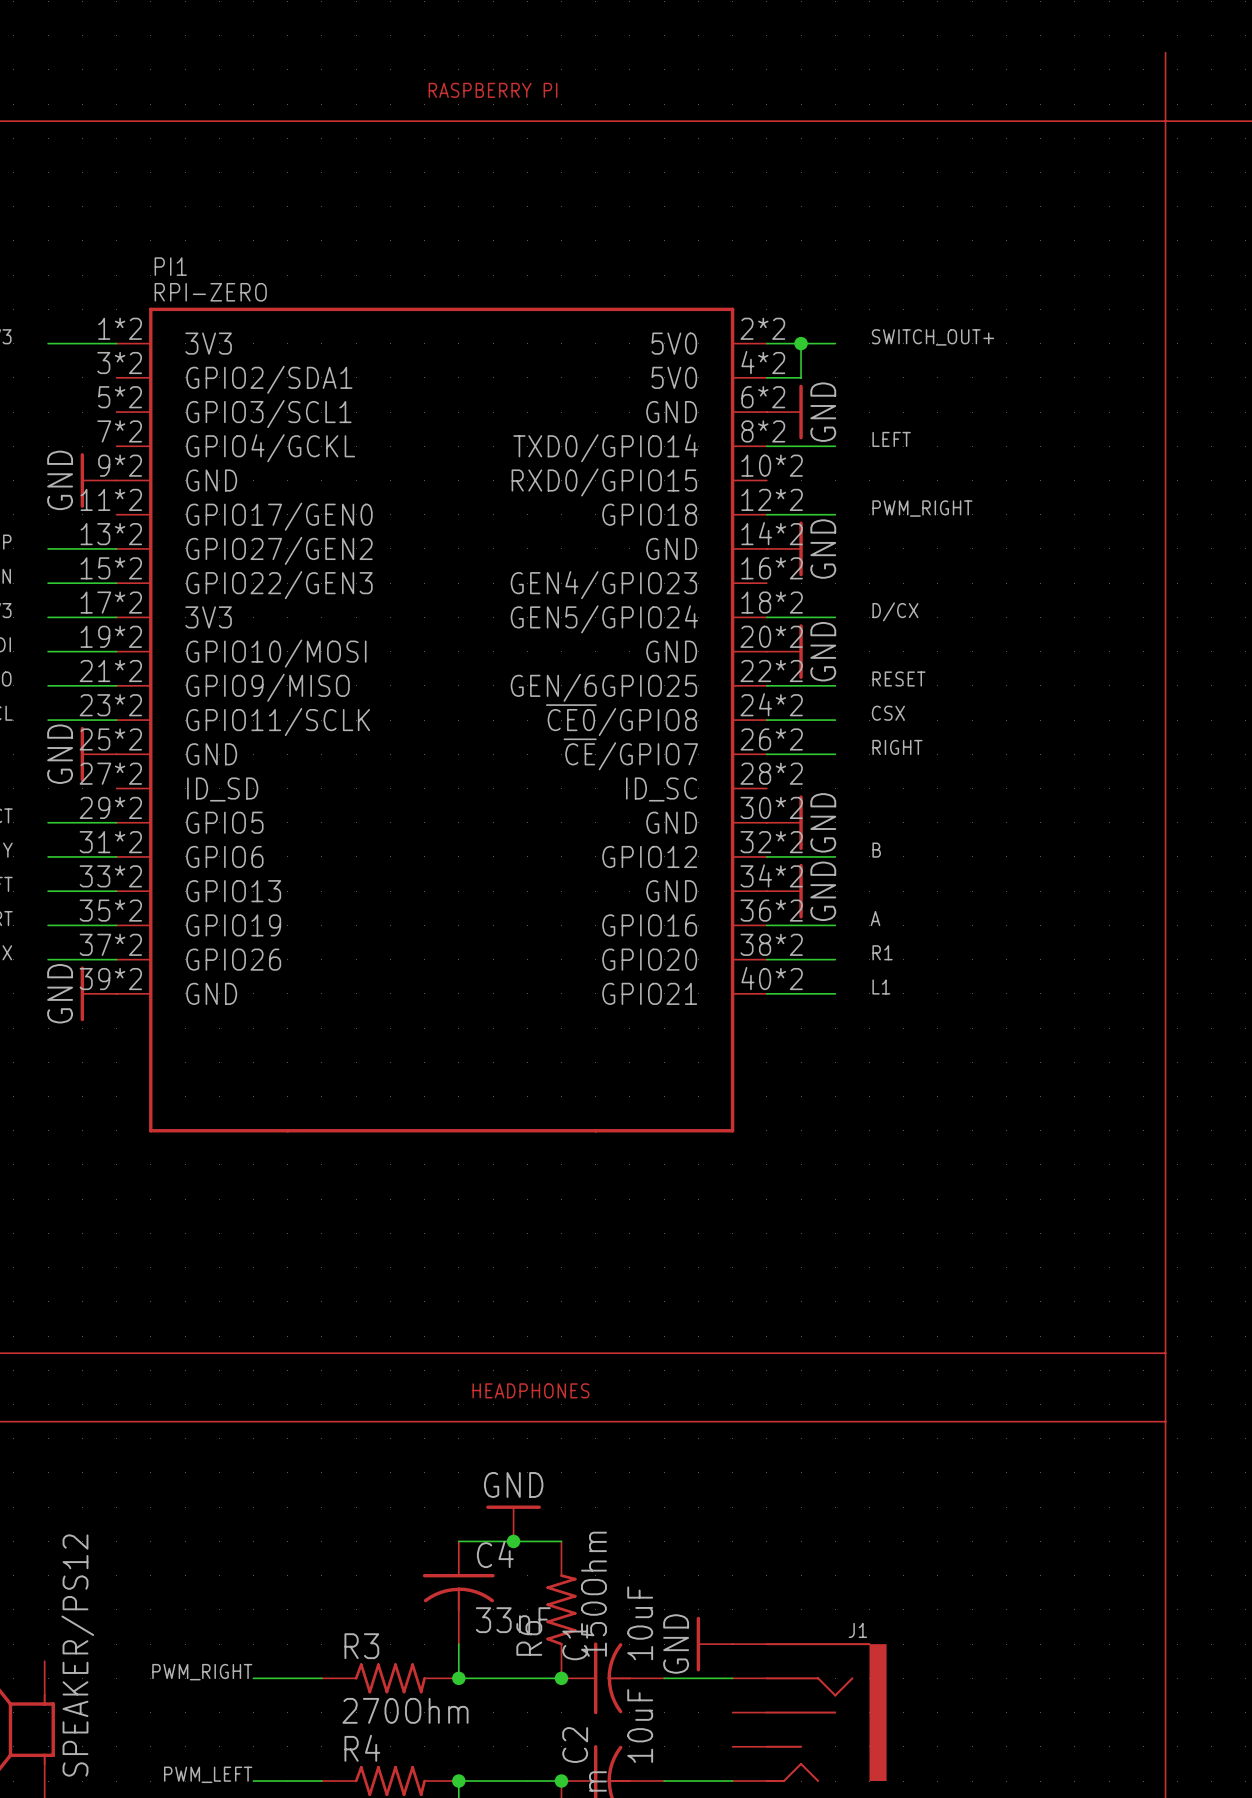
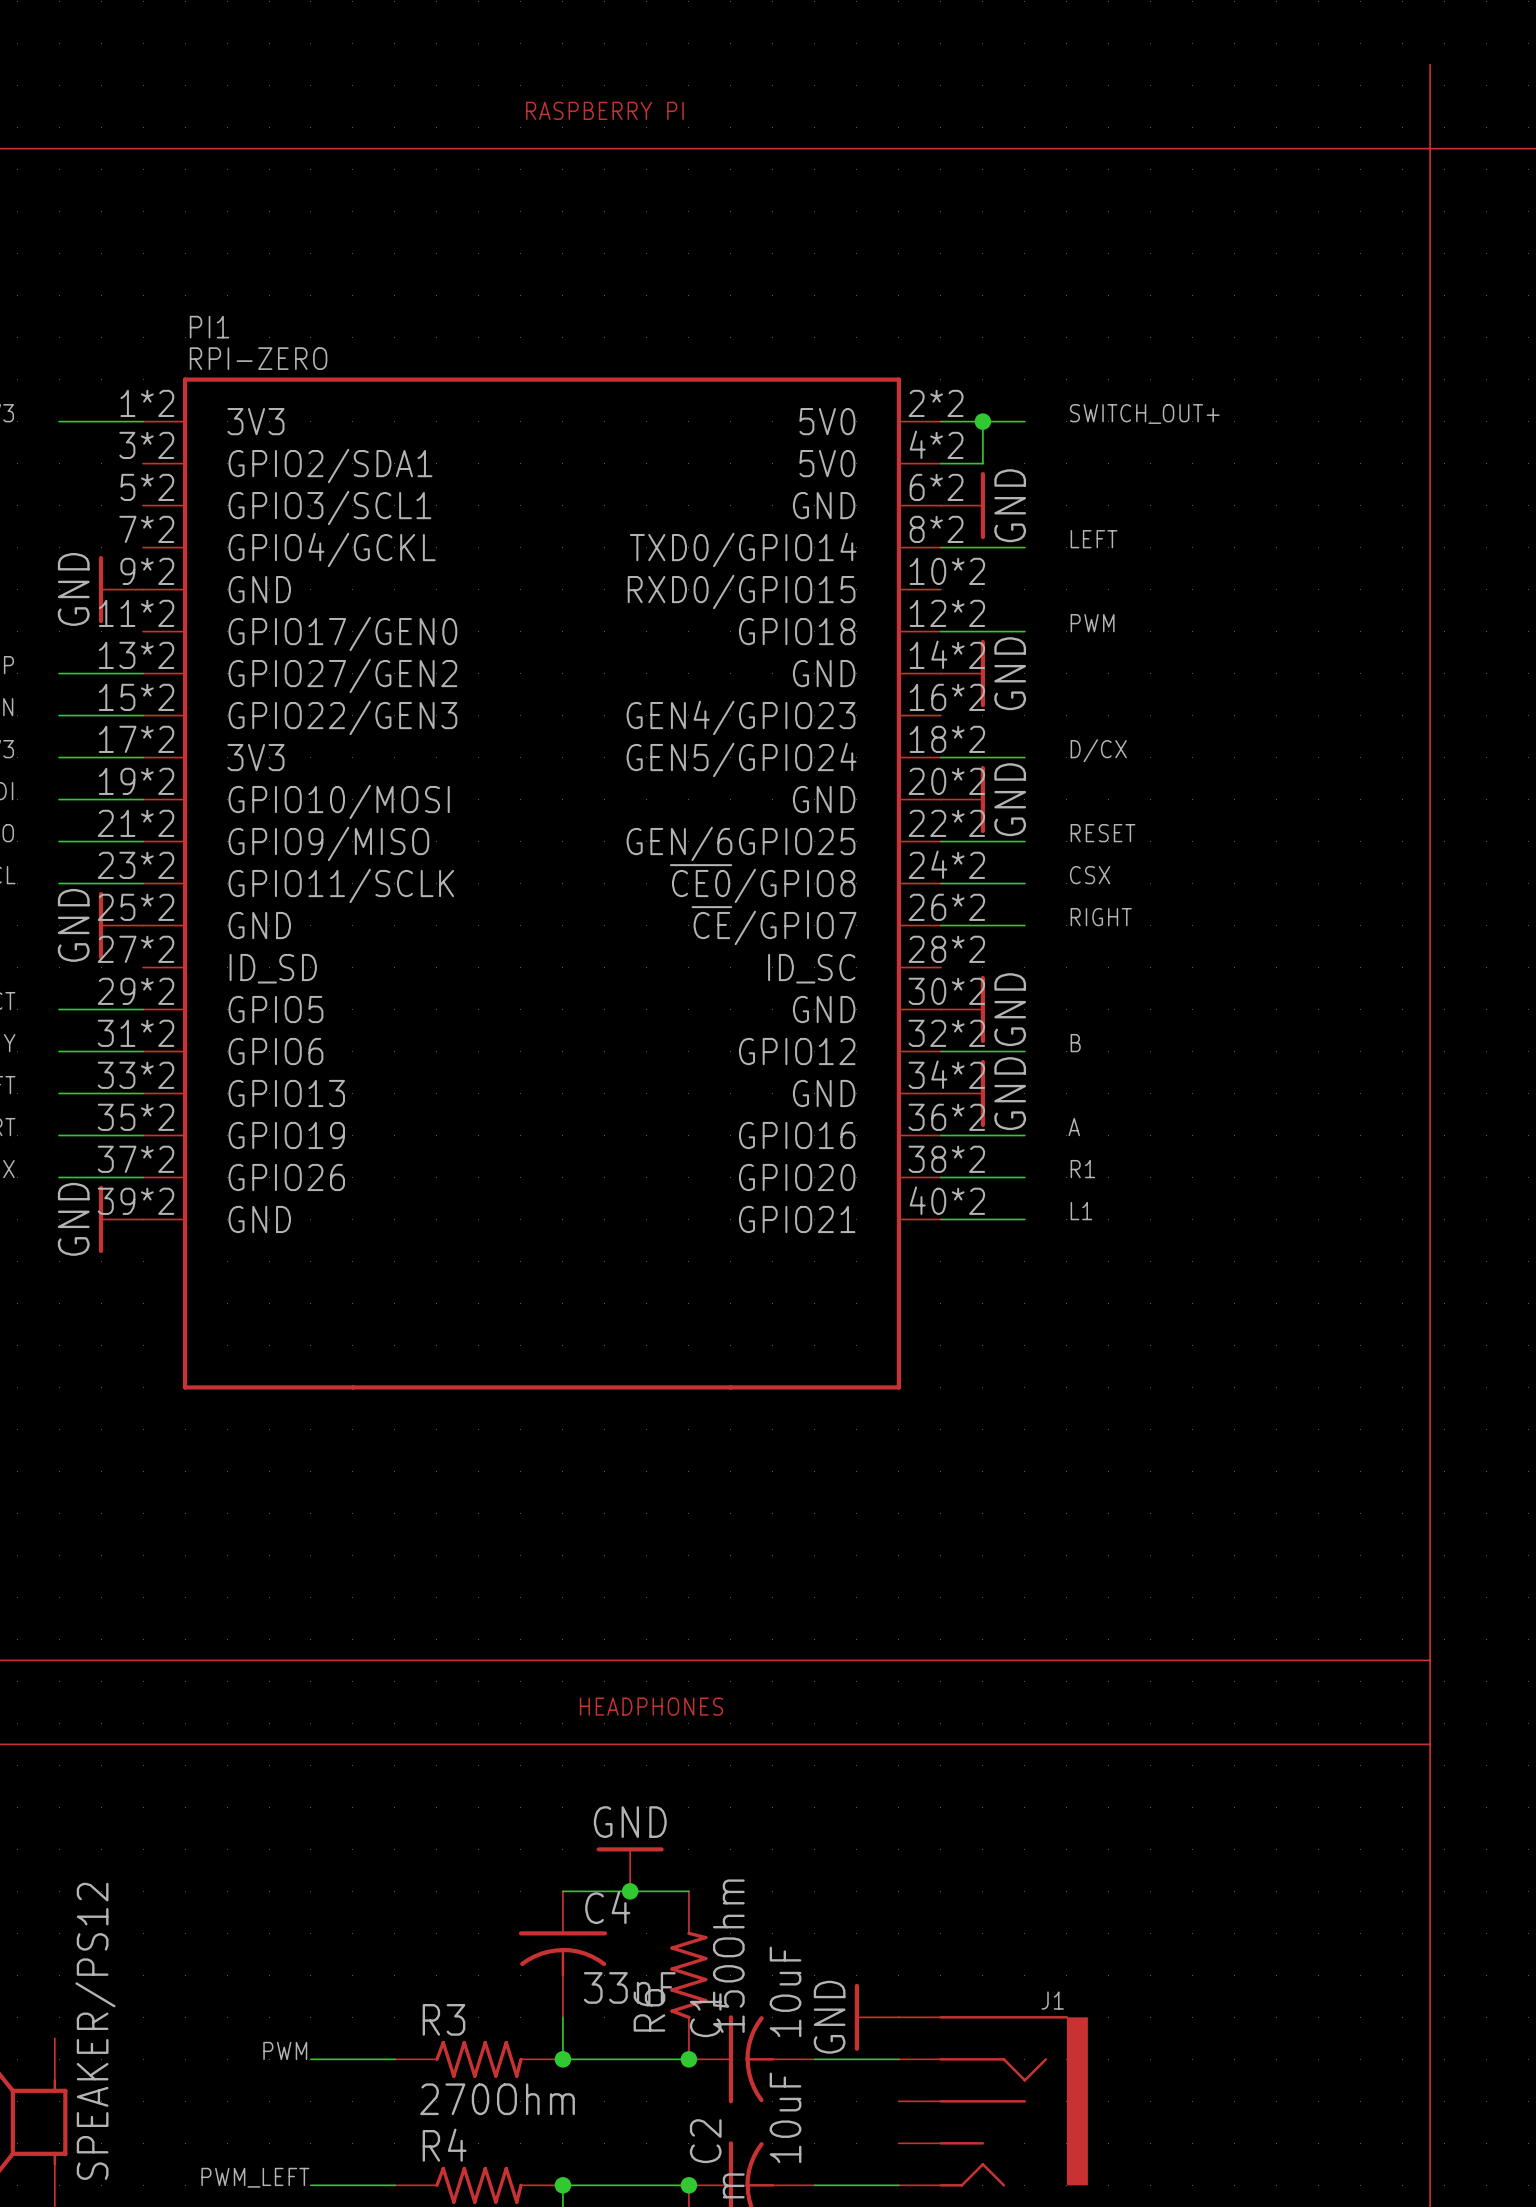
label: PWM_RIGHT (922, 508) -> PWM (1092, 623)
label: PWM_RIGHT (202, 1672) -> PWM (285, 2050)

